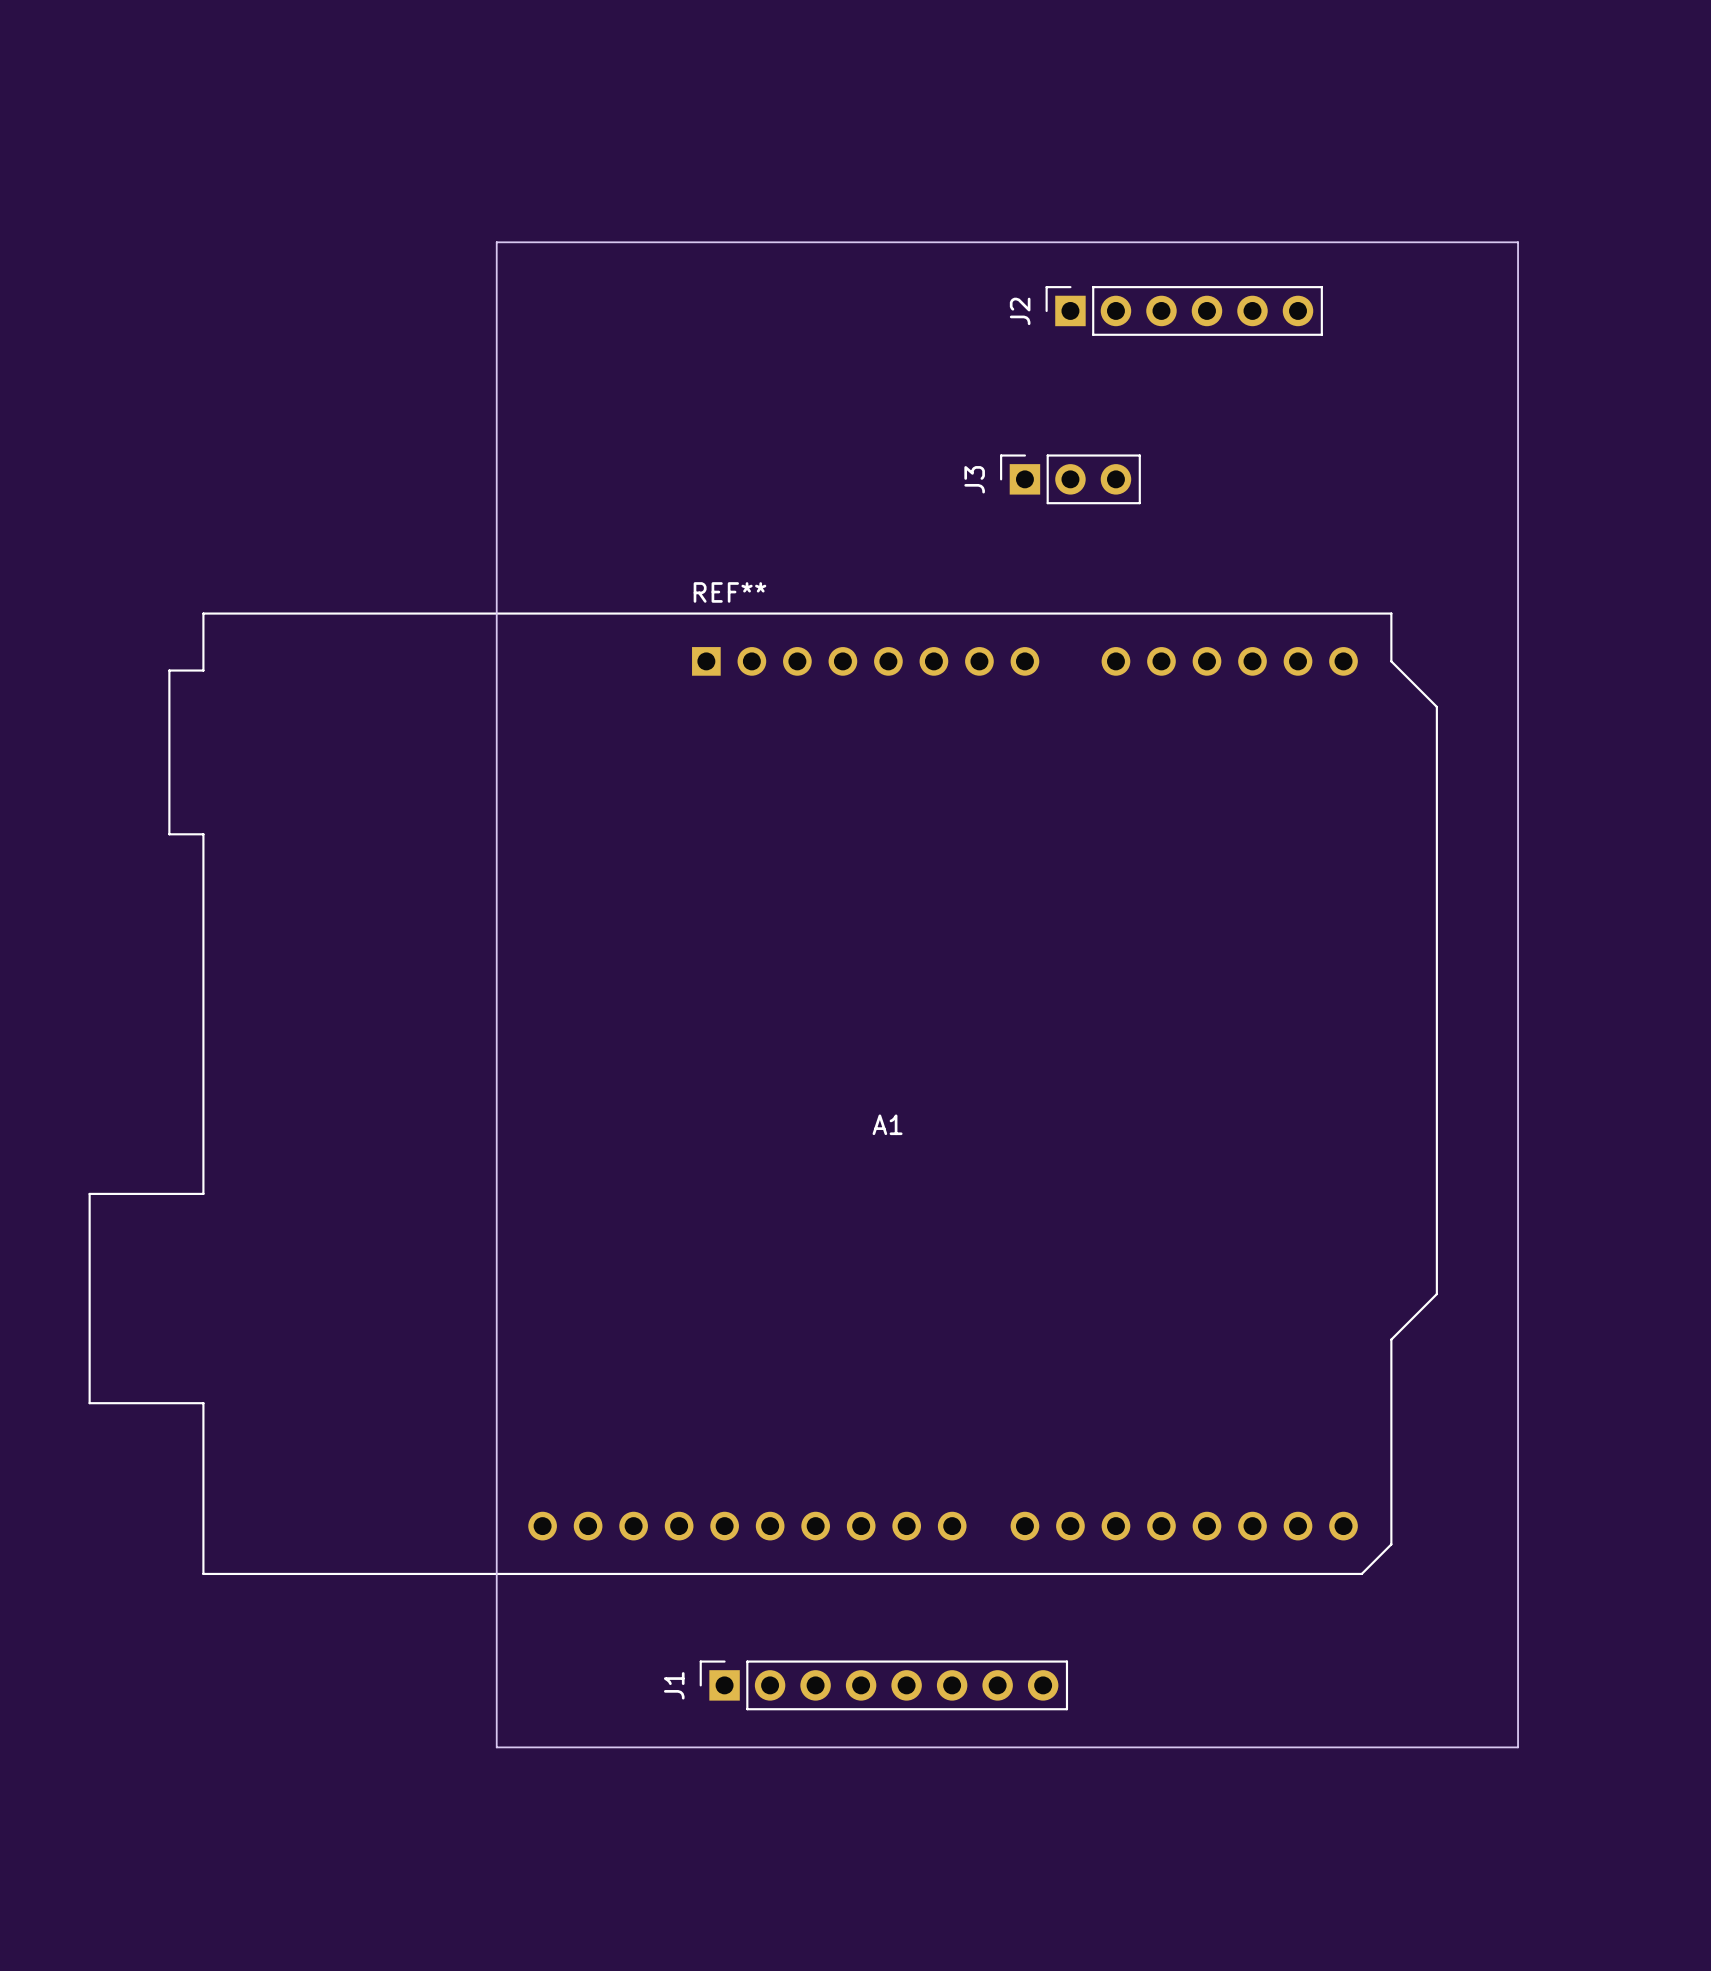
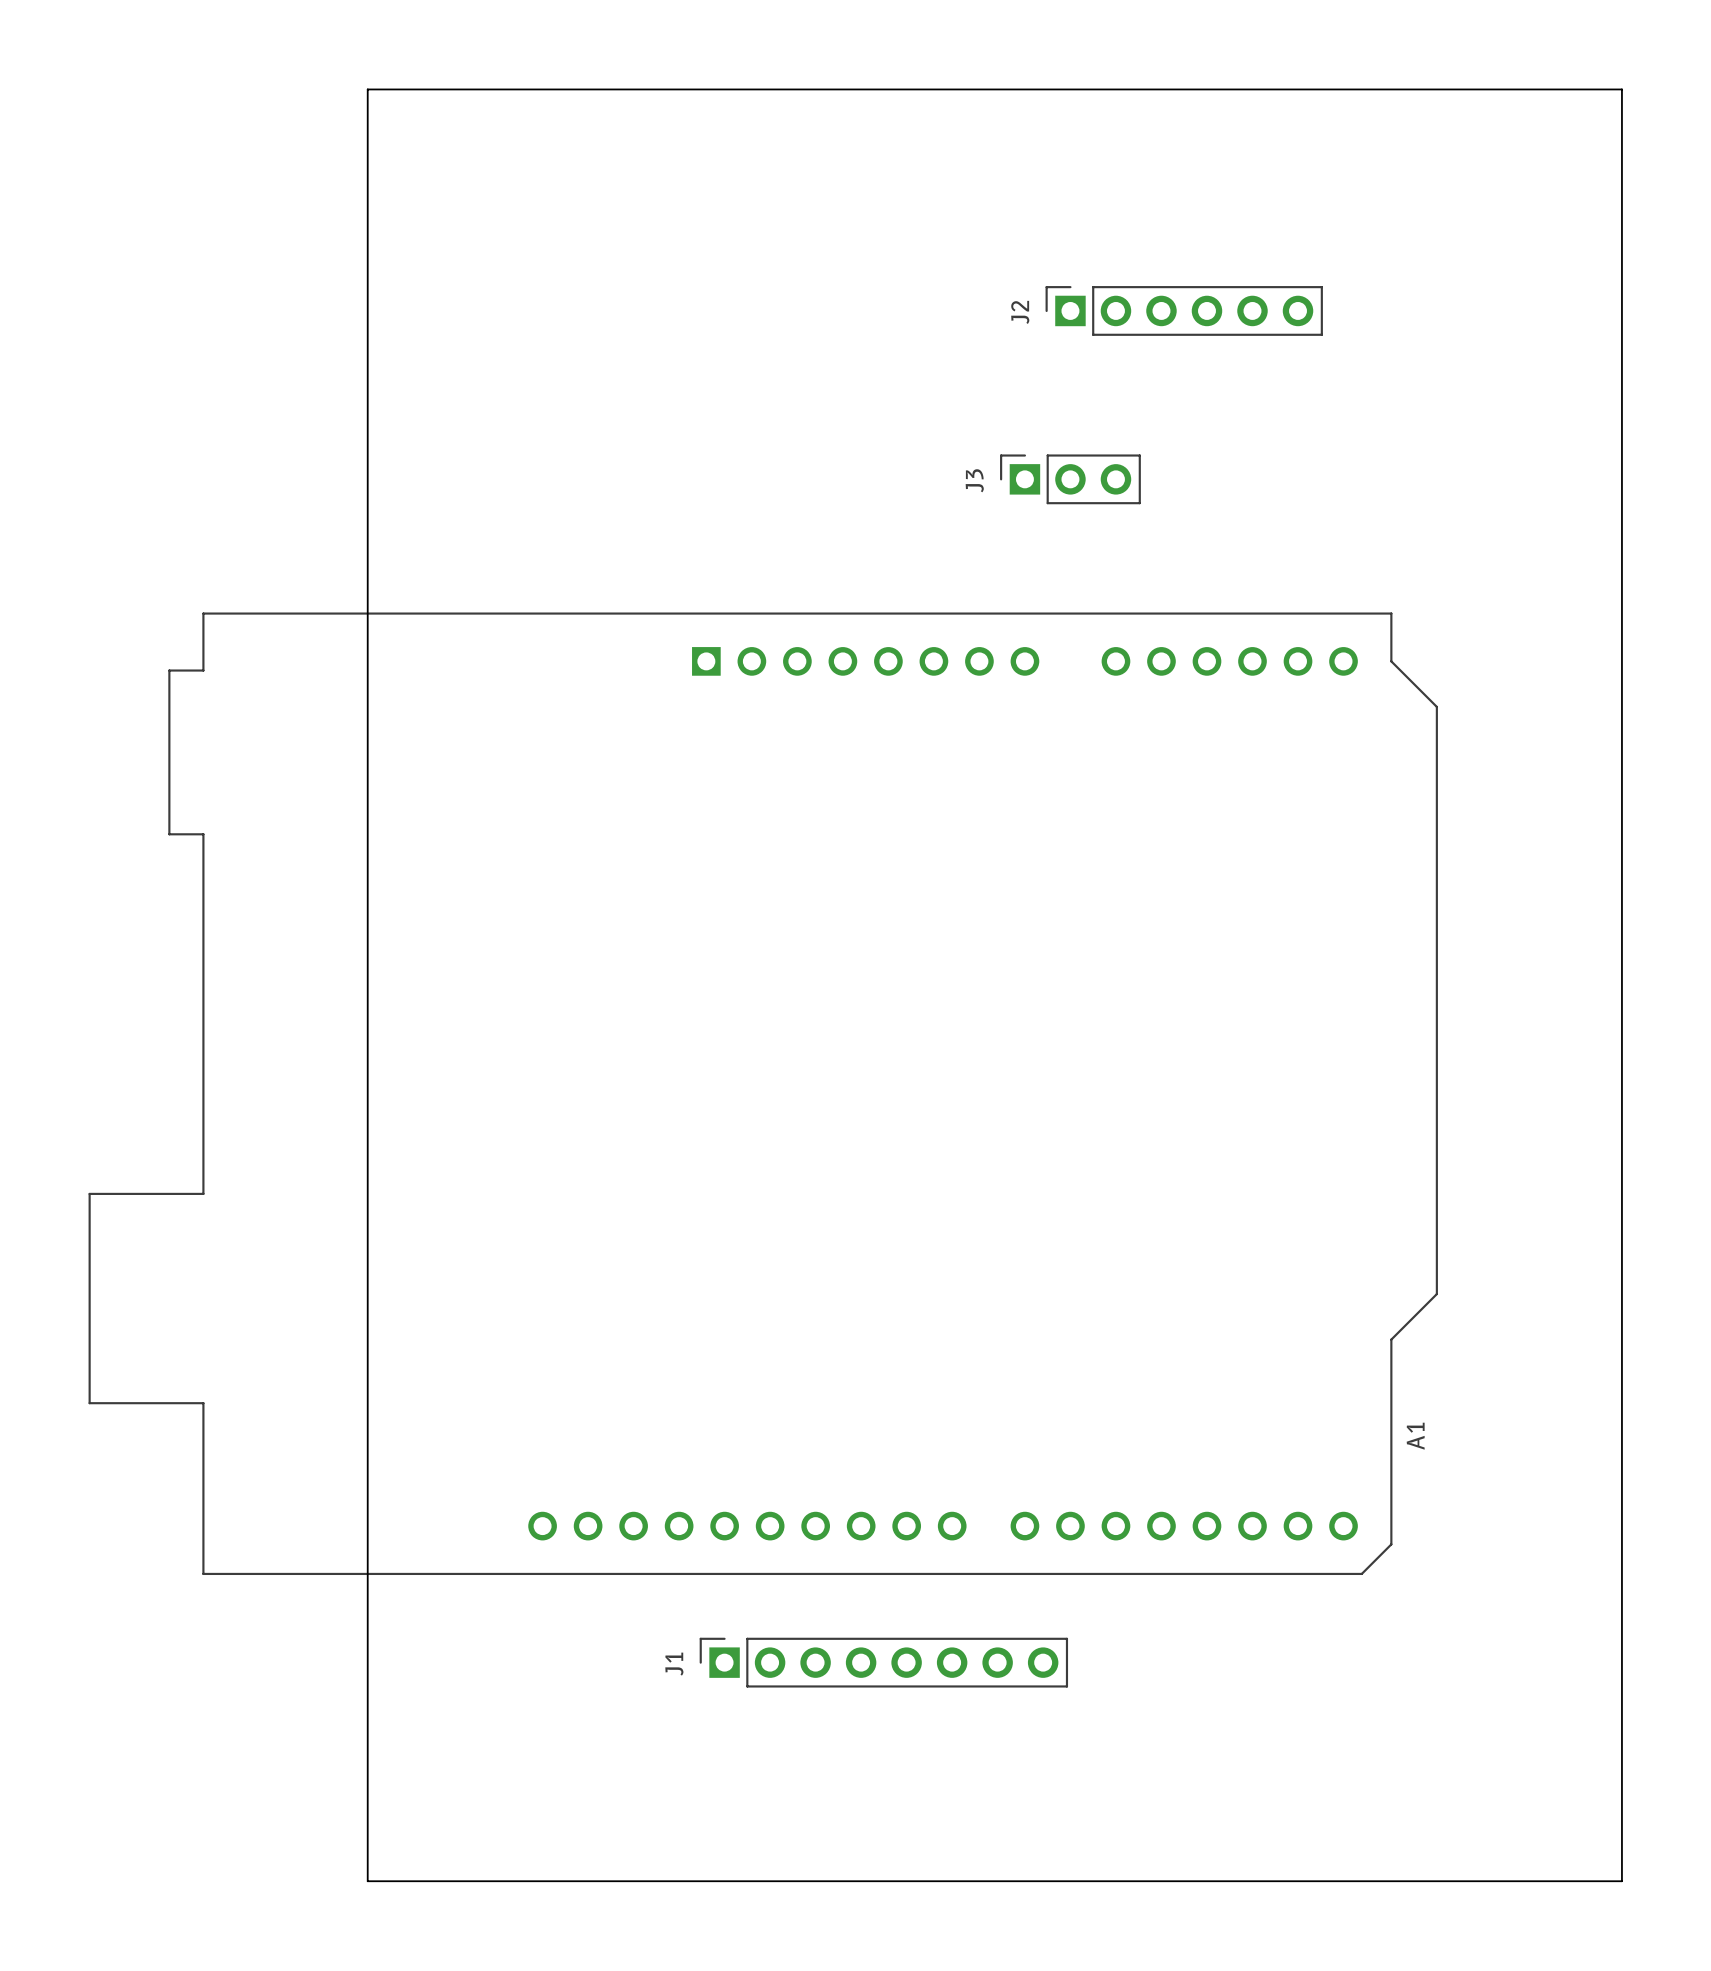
board edge: (496, 242) (1518, 242) (1518, 1747) (496, 1747) (496, 242) -> (367, 89) (367, 1881) (1621, 1881) (1621, 89) (367, 89)
A1 text: REF** (729, 592) -> none
A1 name rotation: 0° (887, 1124) -> 90° counterclockwise (1415, 1436)
A1 name position: A1 (887, 1124) -> A1 (1415, 1436)
J1 position: (883, 1685) -> (883, 1662)

